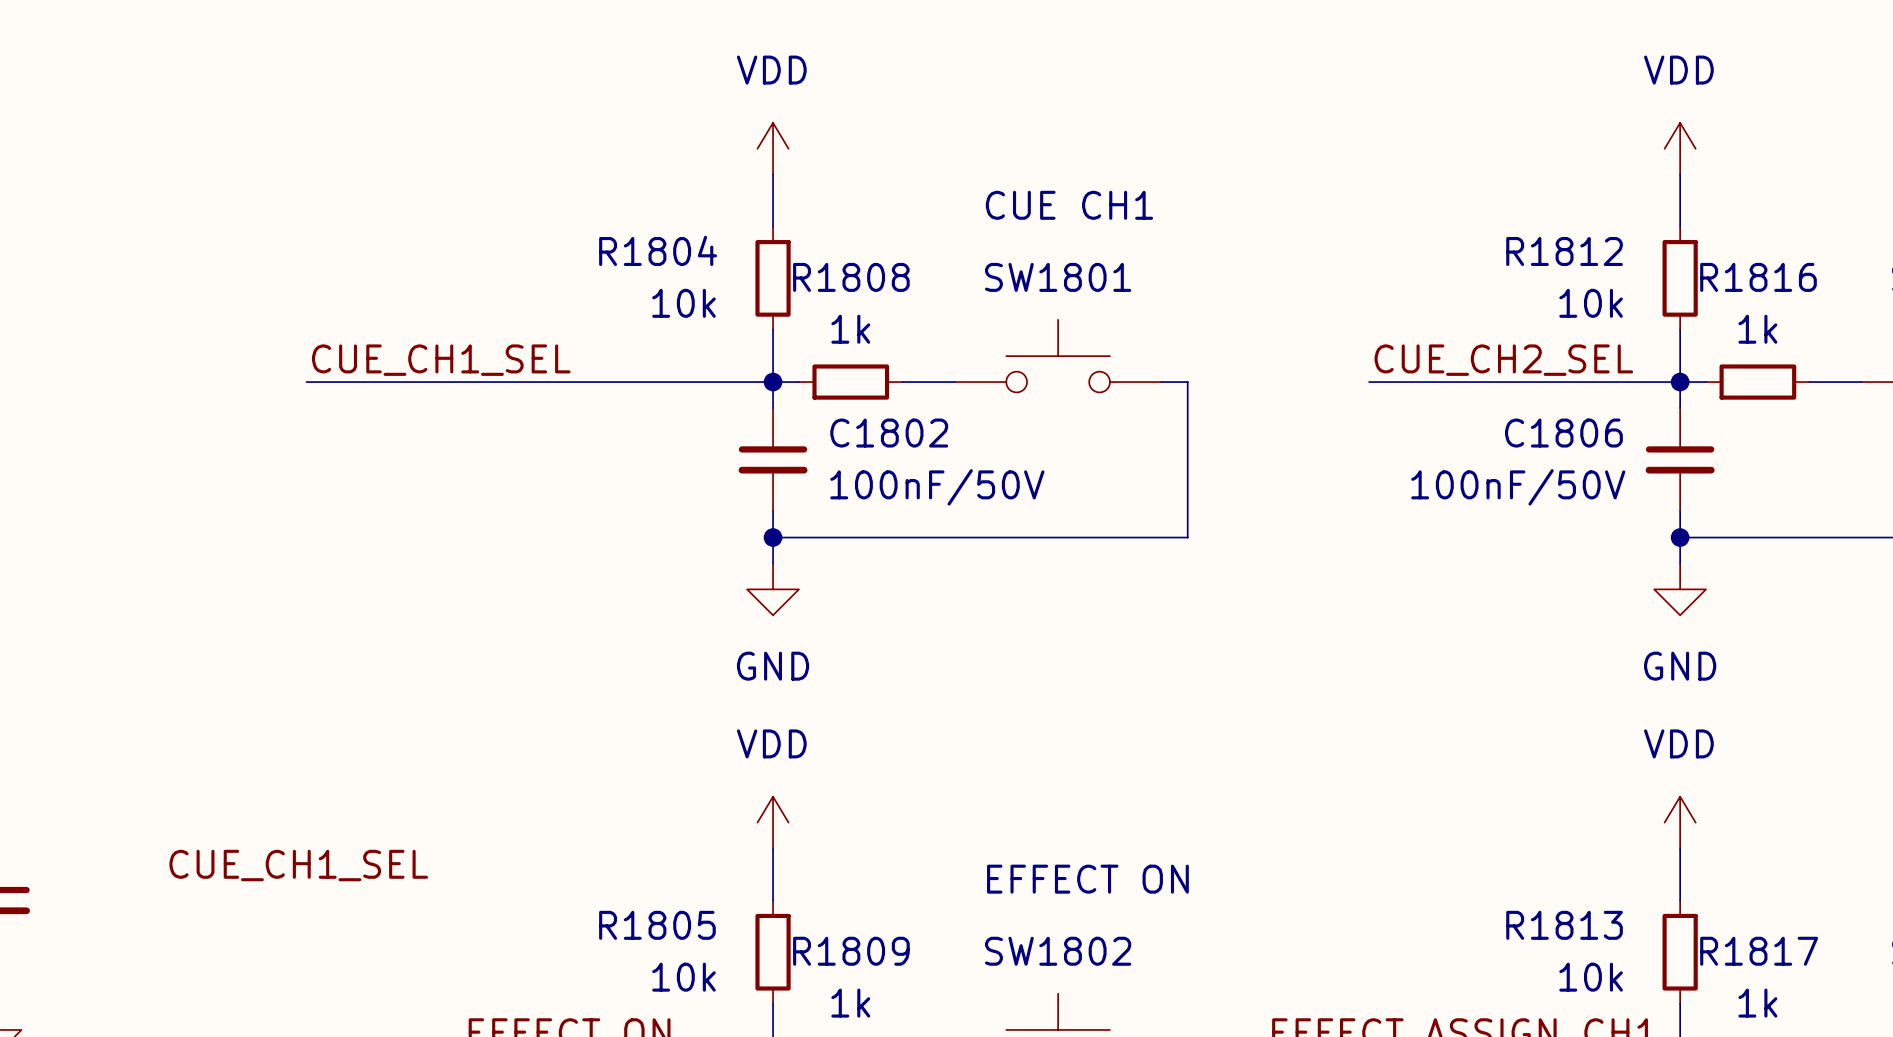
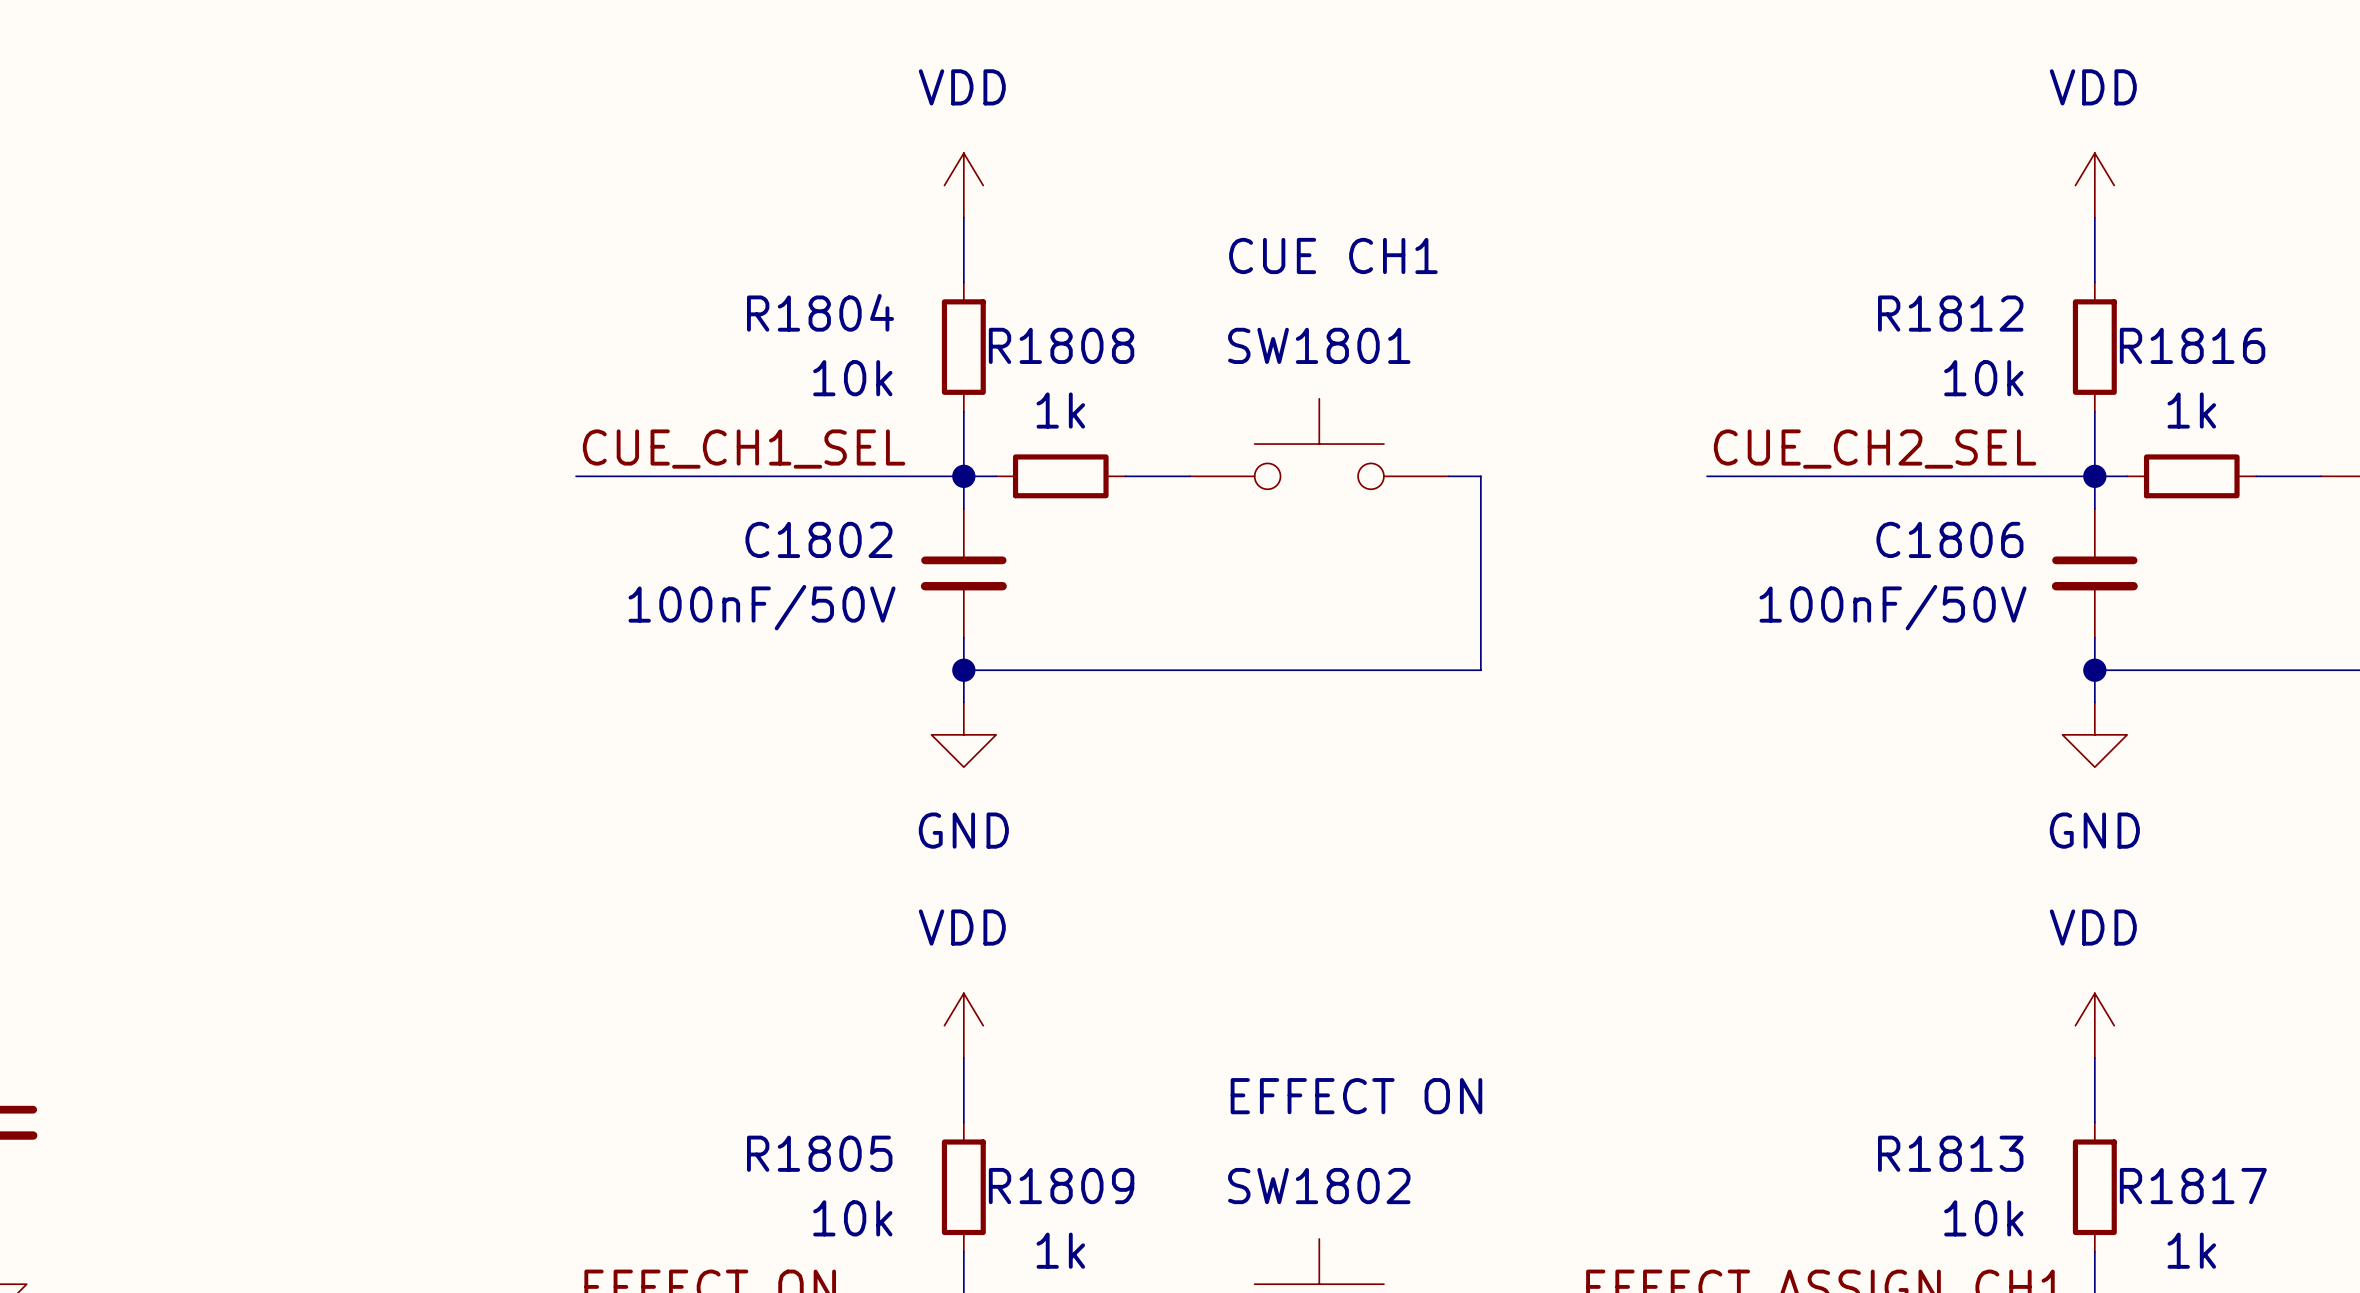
label position: CUE_CH1_SEL (441, 360) -> CUE_CH1_SEL (744, 449)
wire: (306, 382) (462, 382) -> none
C1802 name position: C1802 (889, 433) -> C1802 (818, 539)
C1802 value position: 100nF/50V (937, 487) -> 100nF/50V (762, 607)
label: CUE_CH1_SEL (298, 865) -> none

